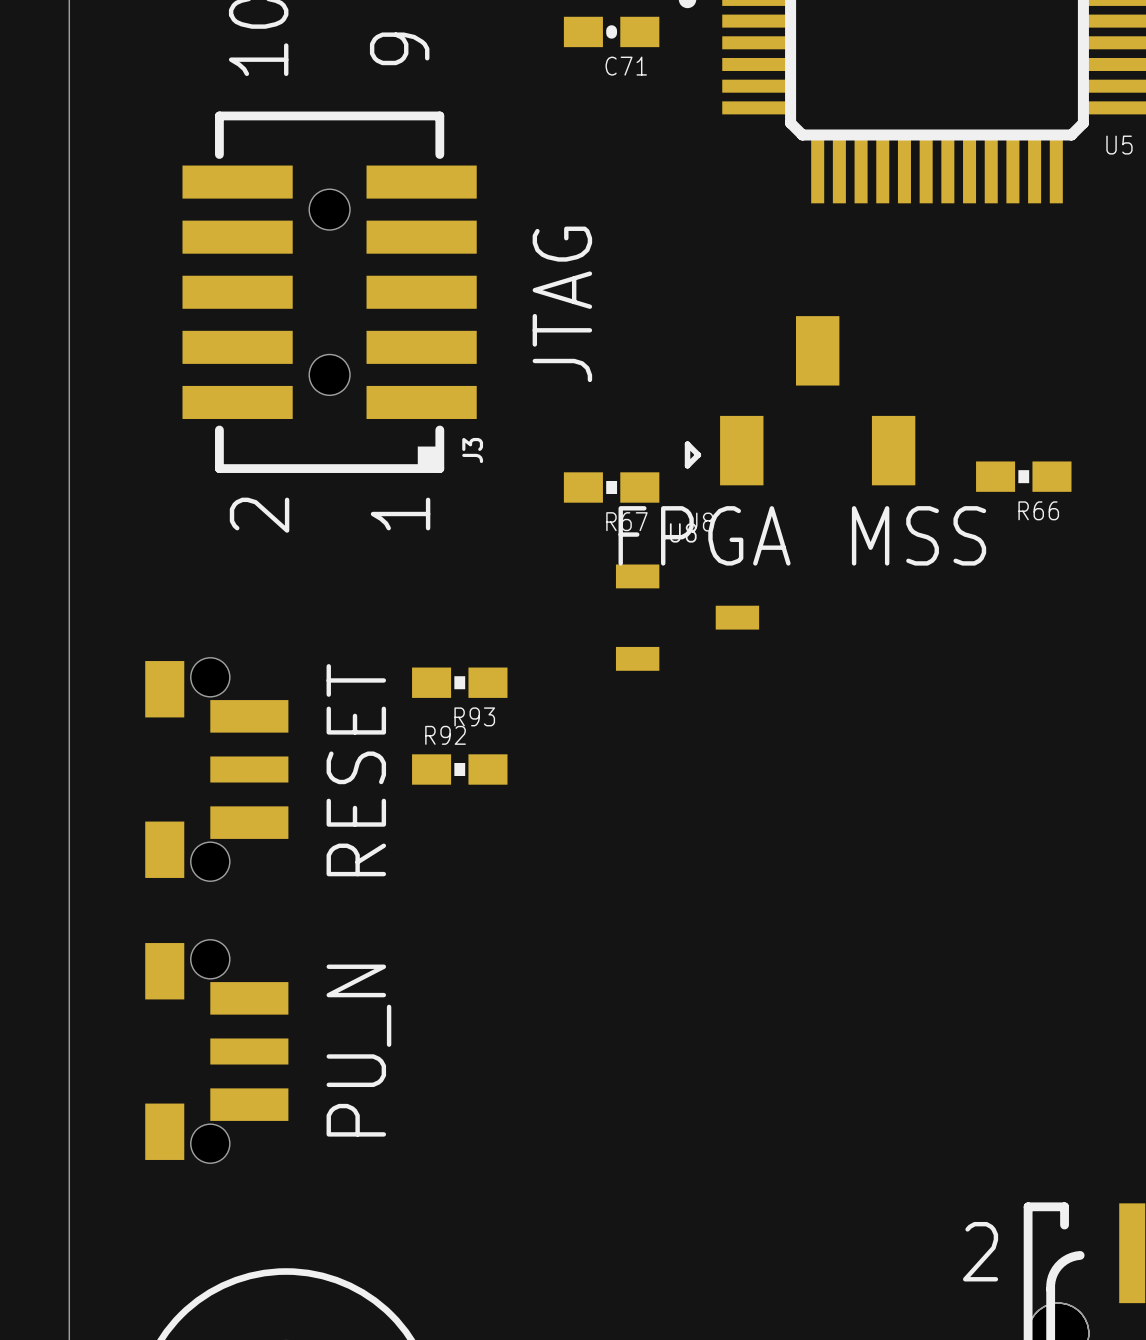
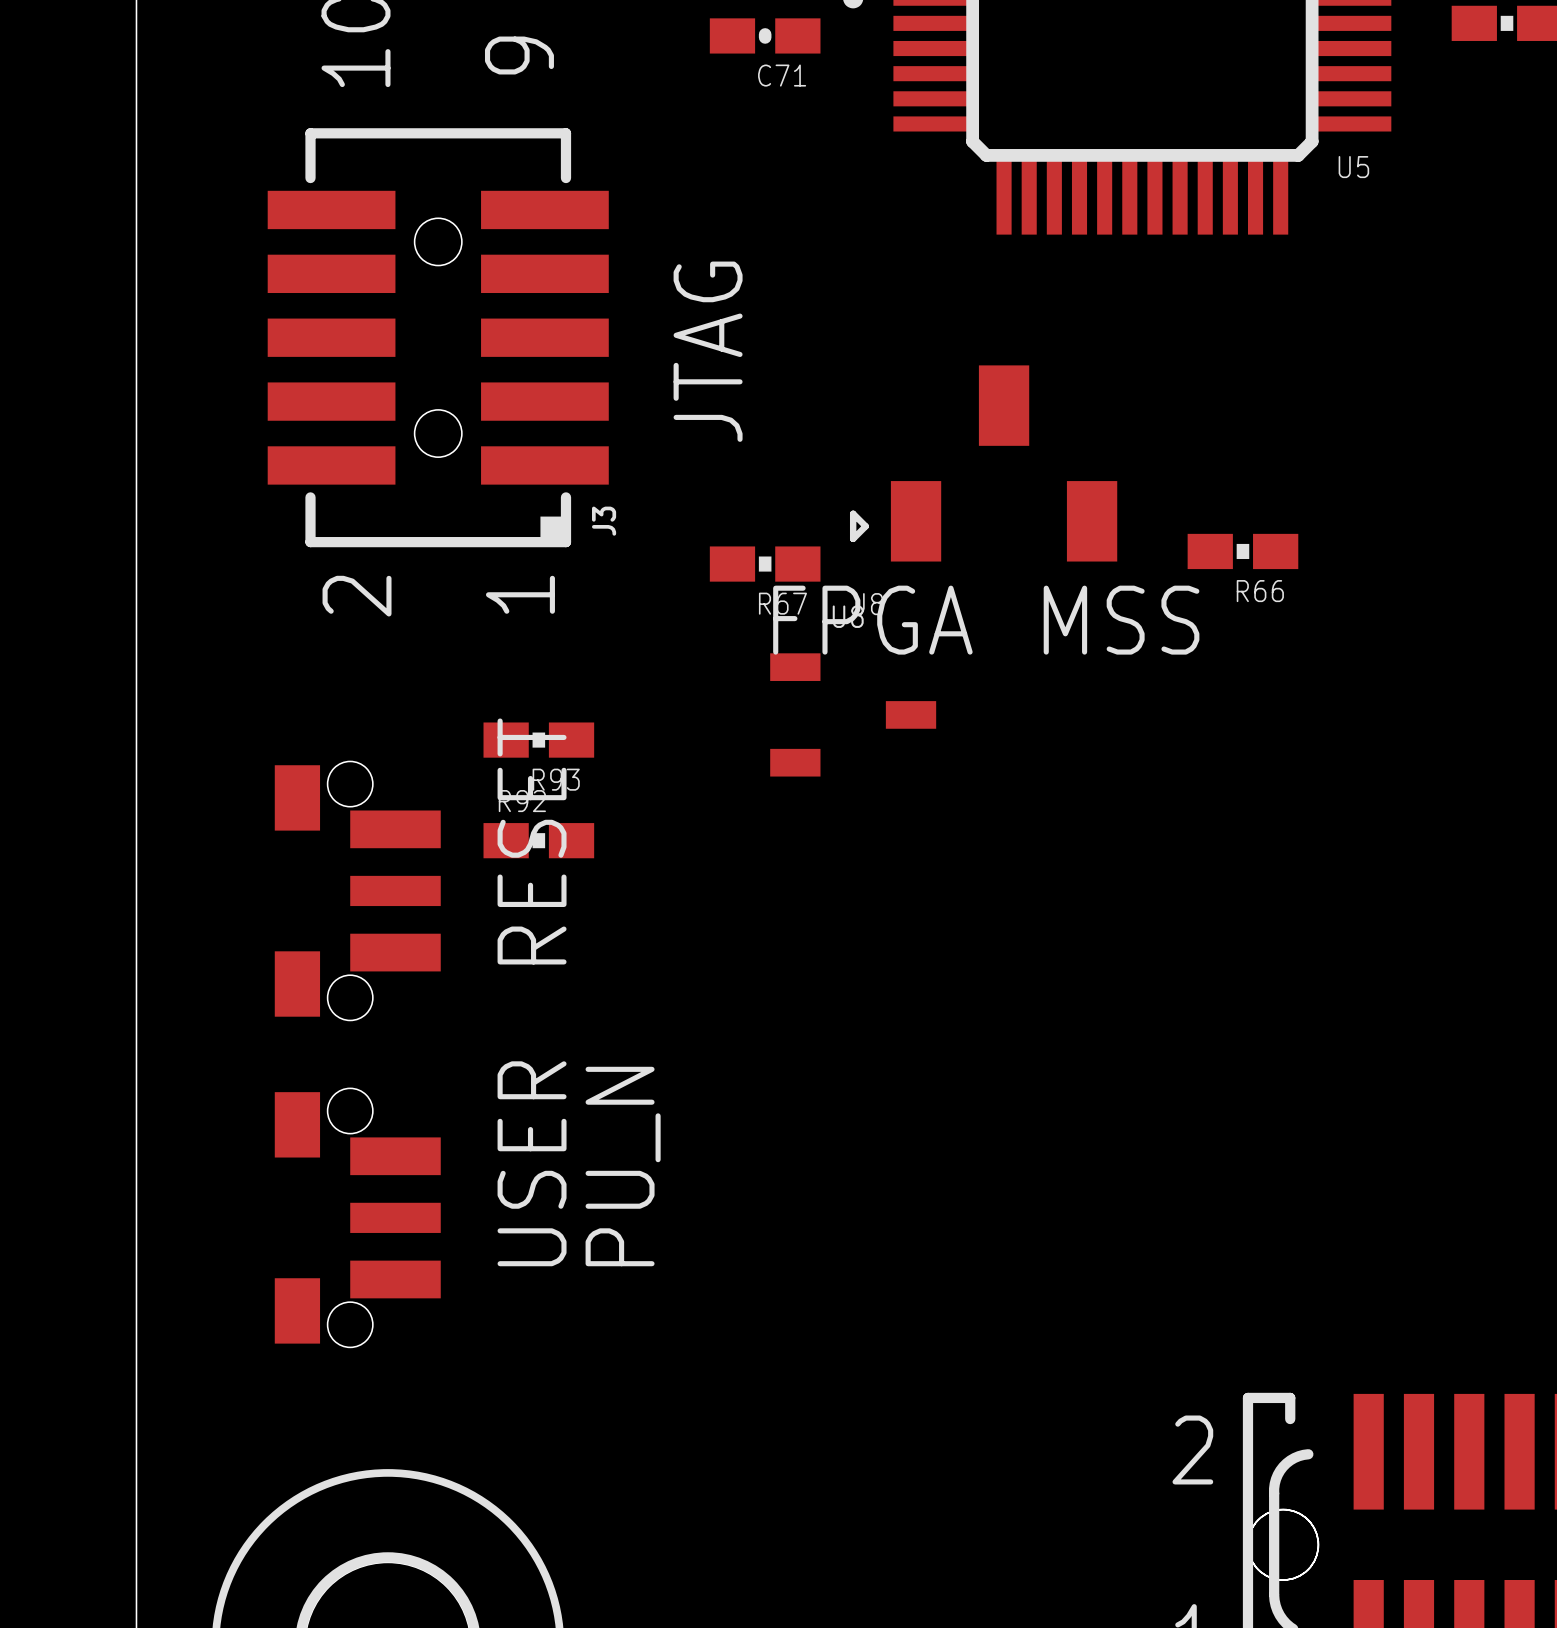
R93 position: (459, 682) -> (538, 740)
part position: (216, 769) -> (357, 890)
R92 position: (459, 769) -> (538, 840)
text position: RESET (356, 770) -> RESET (532, 841)
text: none -> USER (532, 1163)
text position: PU_N (358, 1050) -> PU_N (623, 1166)
part position: (216, 1051) -> (357, 1217)

